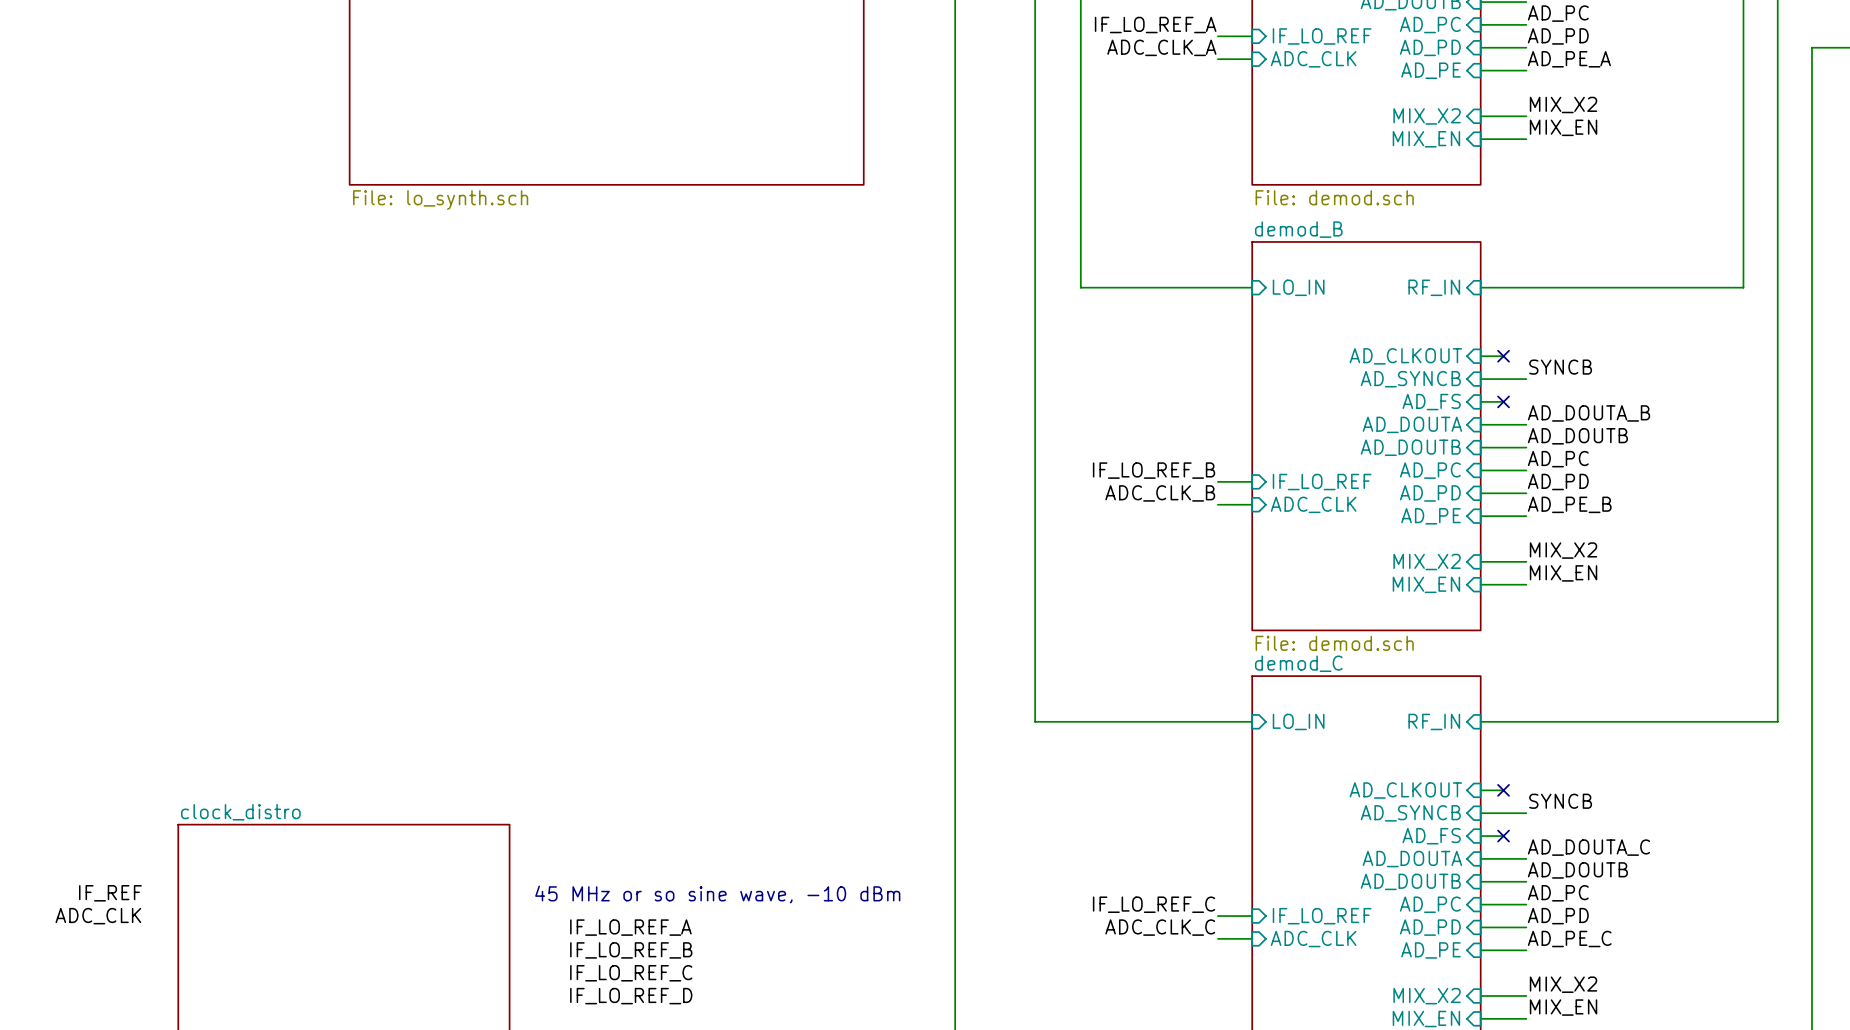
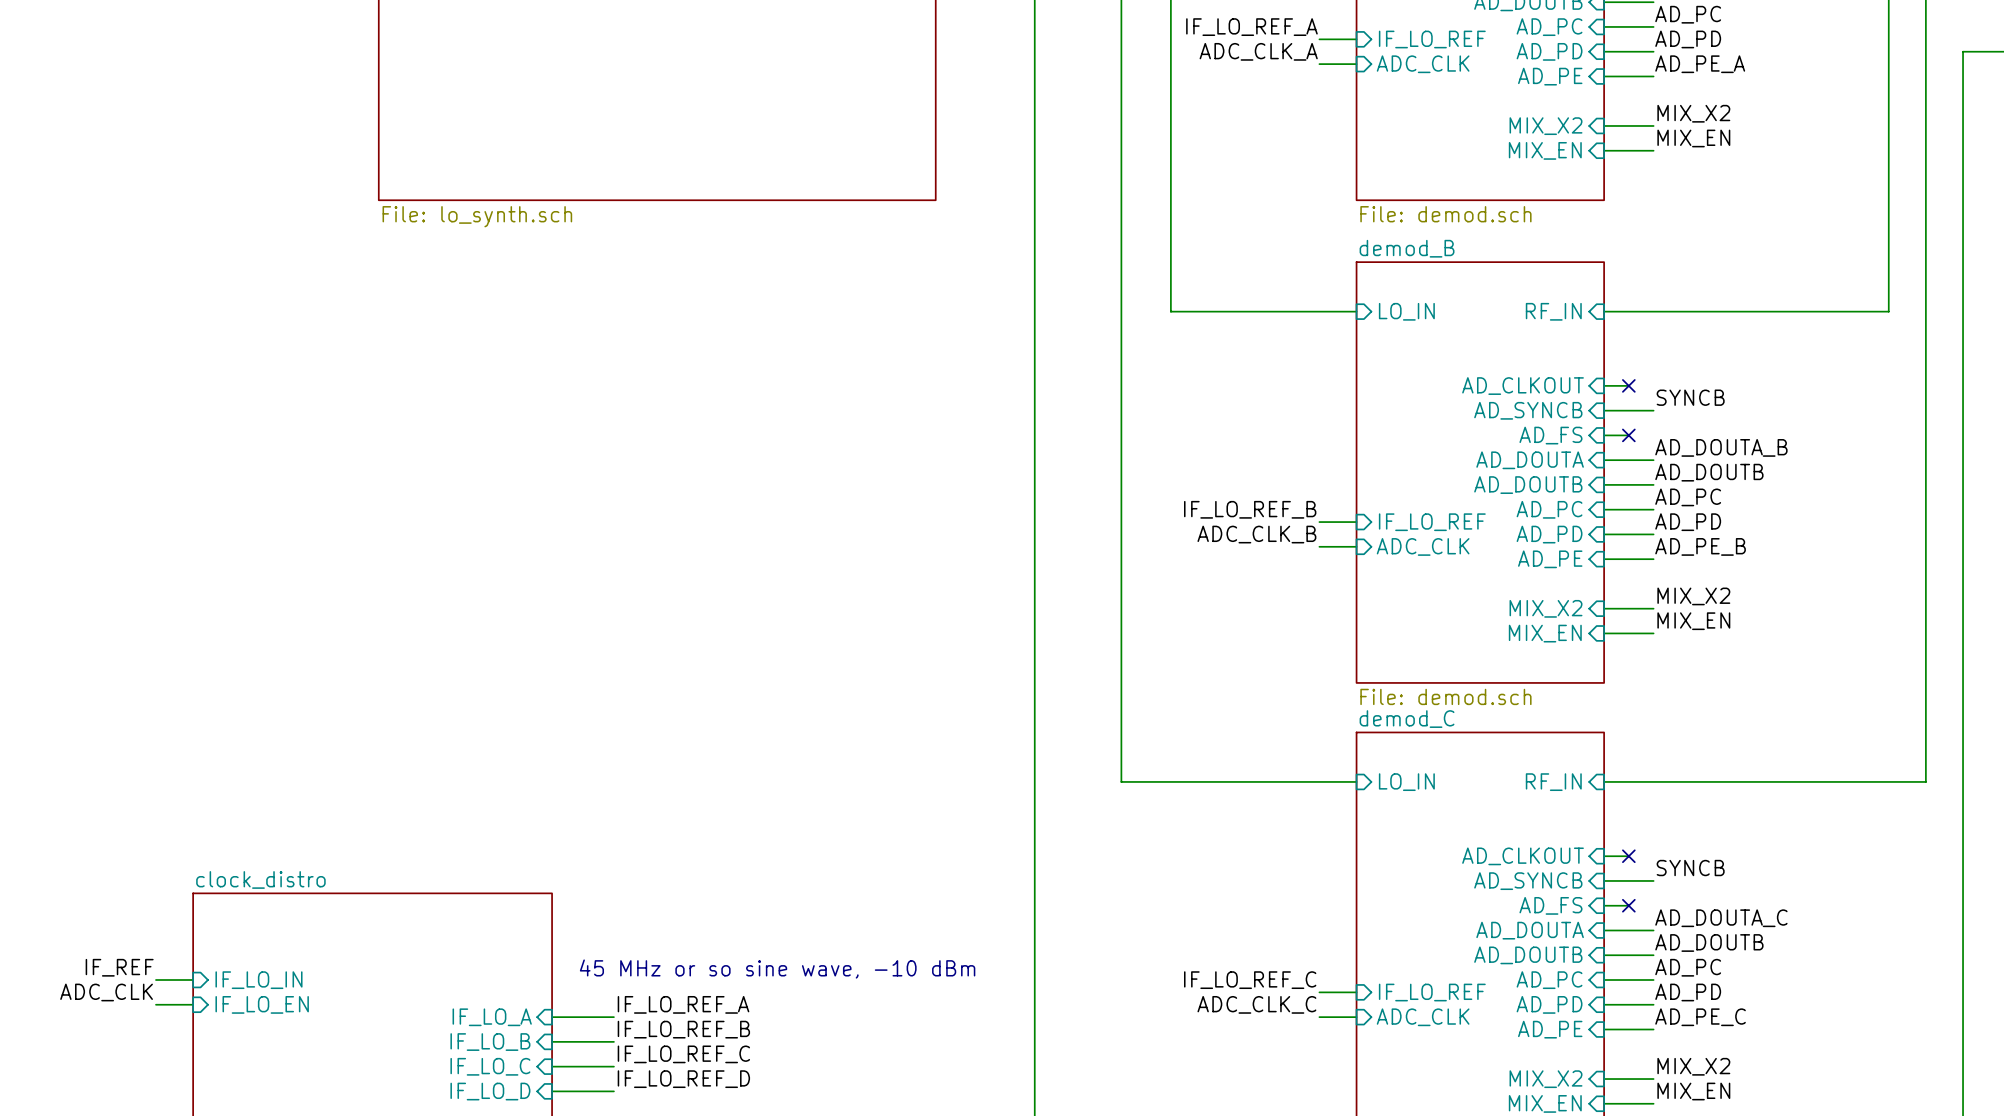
wire: none -> (155, 980) (193, 980)
sheet pin: none -> IF_LO_IN (258, 980)
wire: none -> (155, 1004) (193, 1004)
sheet pin: none -> IF_LO_EN (262, 1004)
wire: none -> (552, 1017) (613, 1017)
sheet pin: none -> IF_LO_A (492, 1017)
sheet pin: none -> IF_LO_B (490, 1042)
wire: none -> (552, 1041) (613, 1041)
sheet pin: none -> IF_LO_C (490, 1066)
wire: none -> (552, 1066) (613, 1066)
sheet pin: none -> IF_LO_D (490, 1091)
wire: none -> (552, 1091) (613, 1091)

